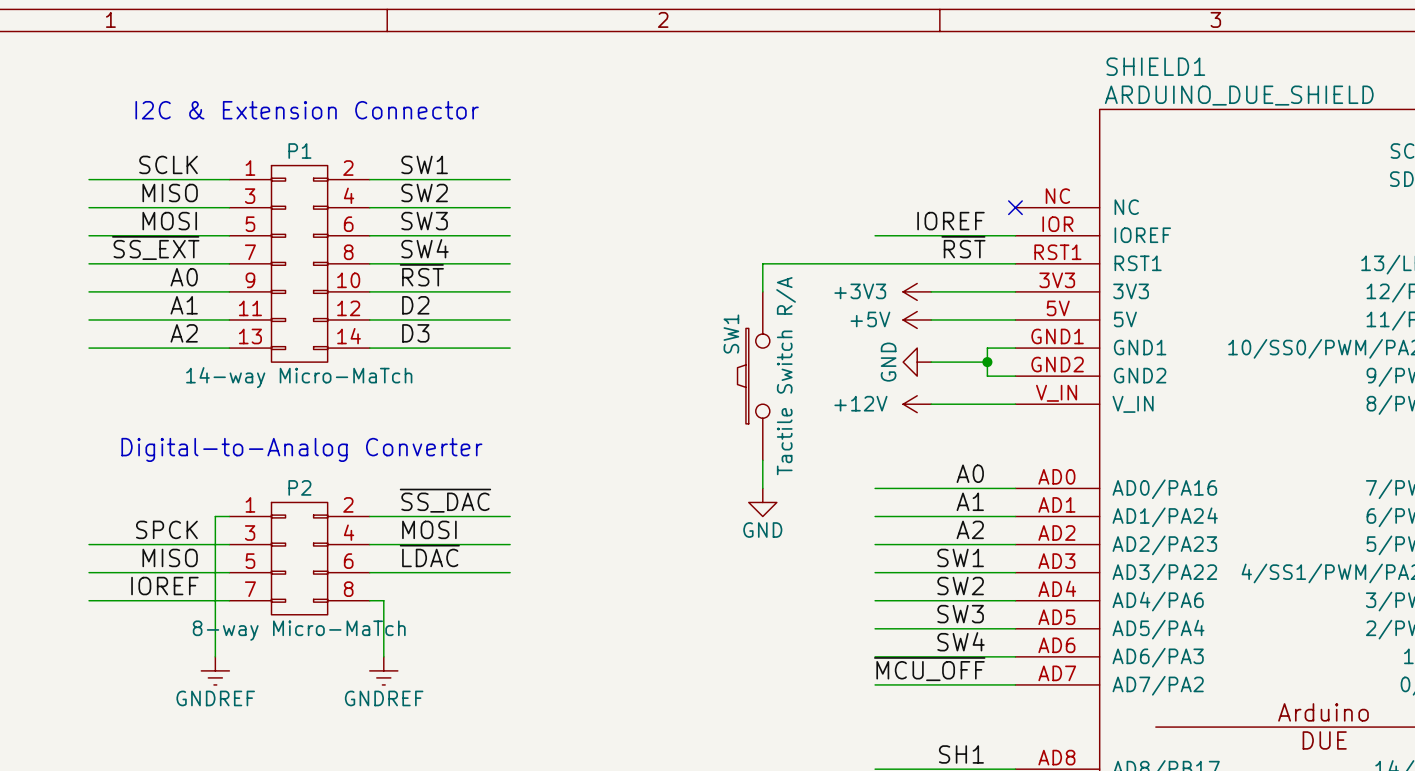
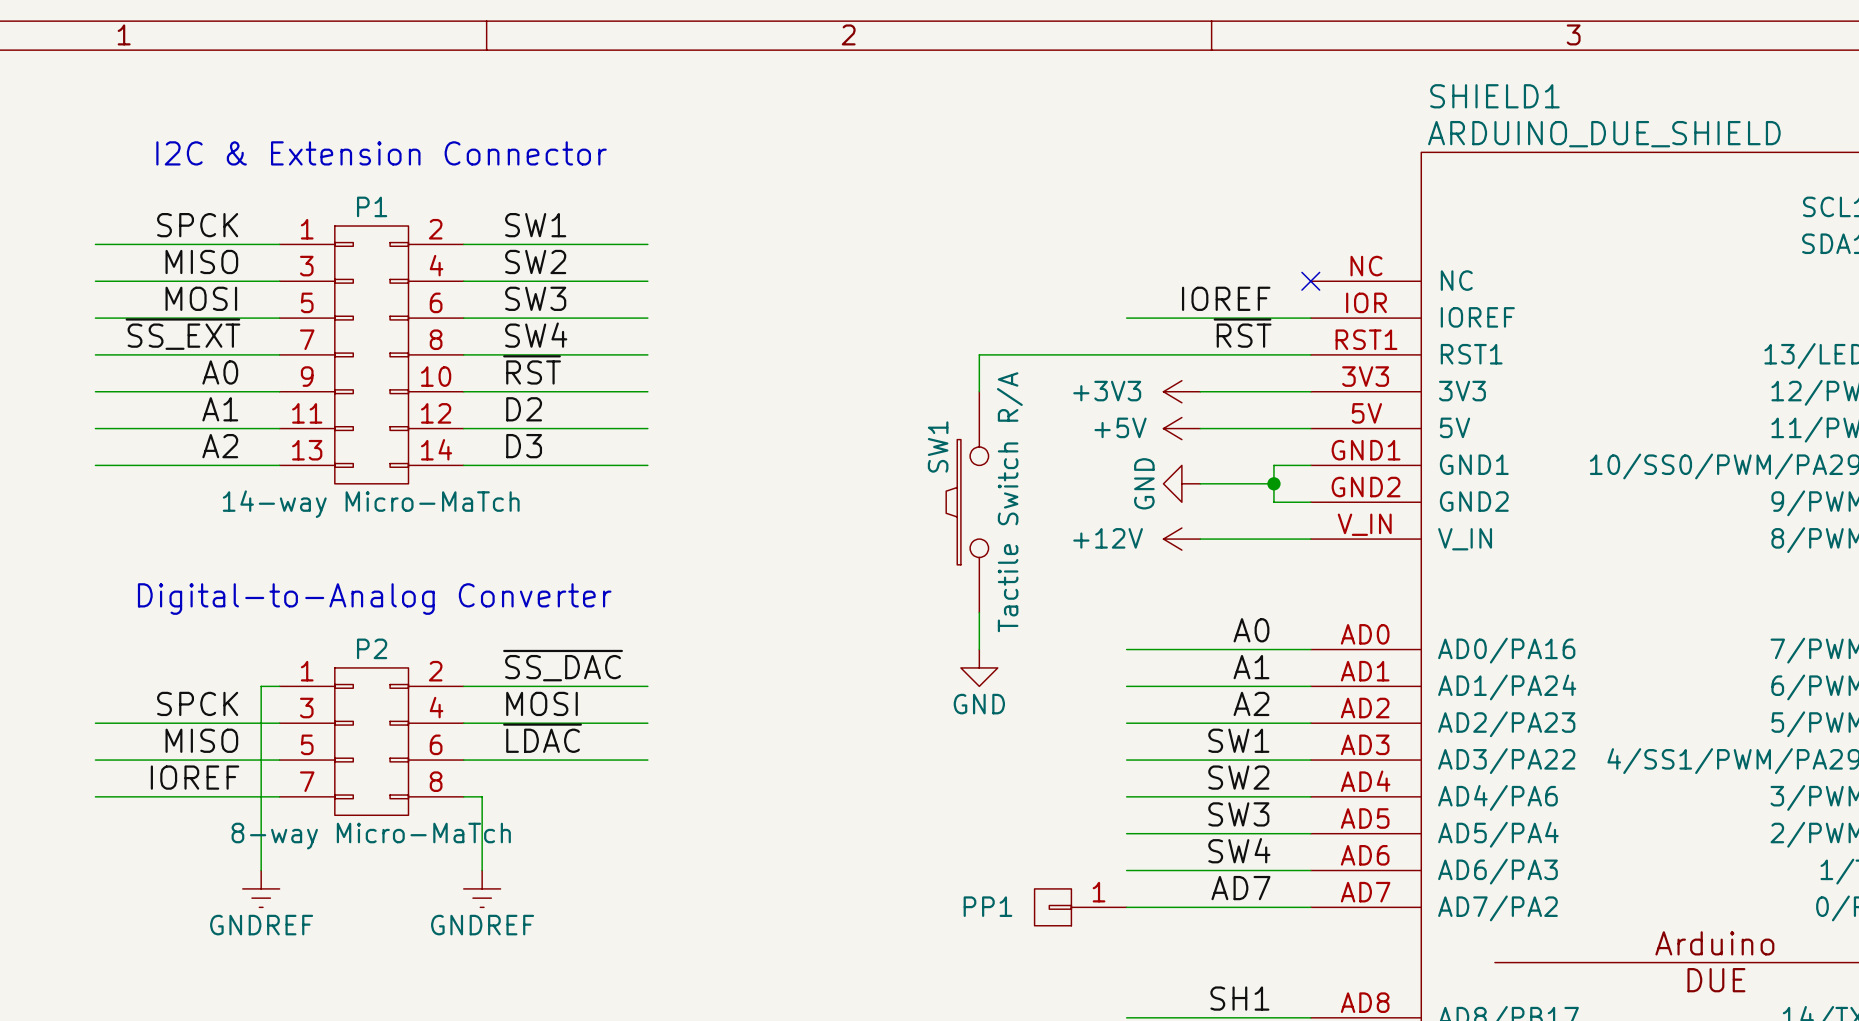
label: SCLK (168, 164) -> SPCK (197, 225)
label: ~{MCU_OFF} (929, 669) -> AD7 (1240, 888)
PP1: none -> (1080, 907)

